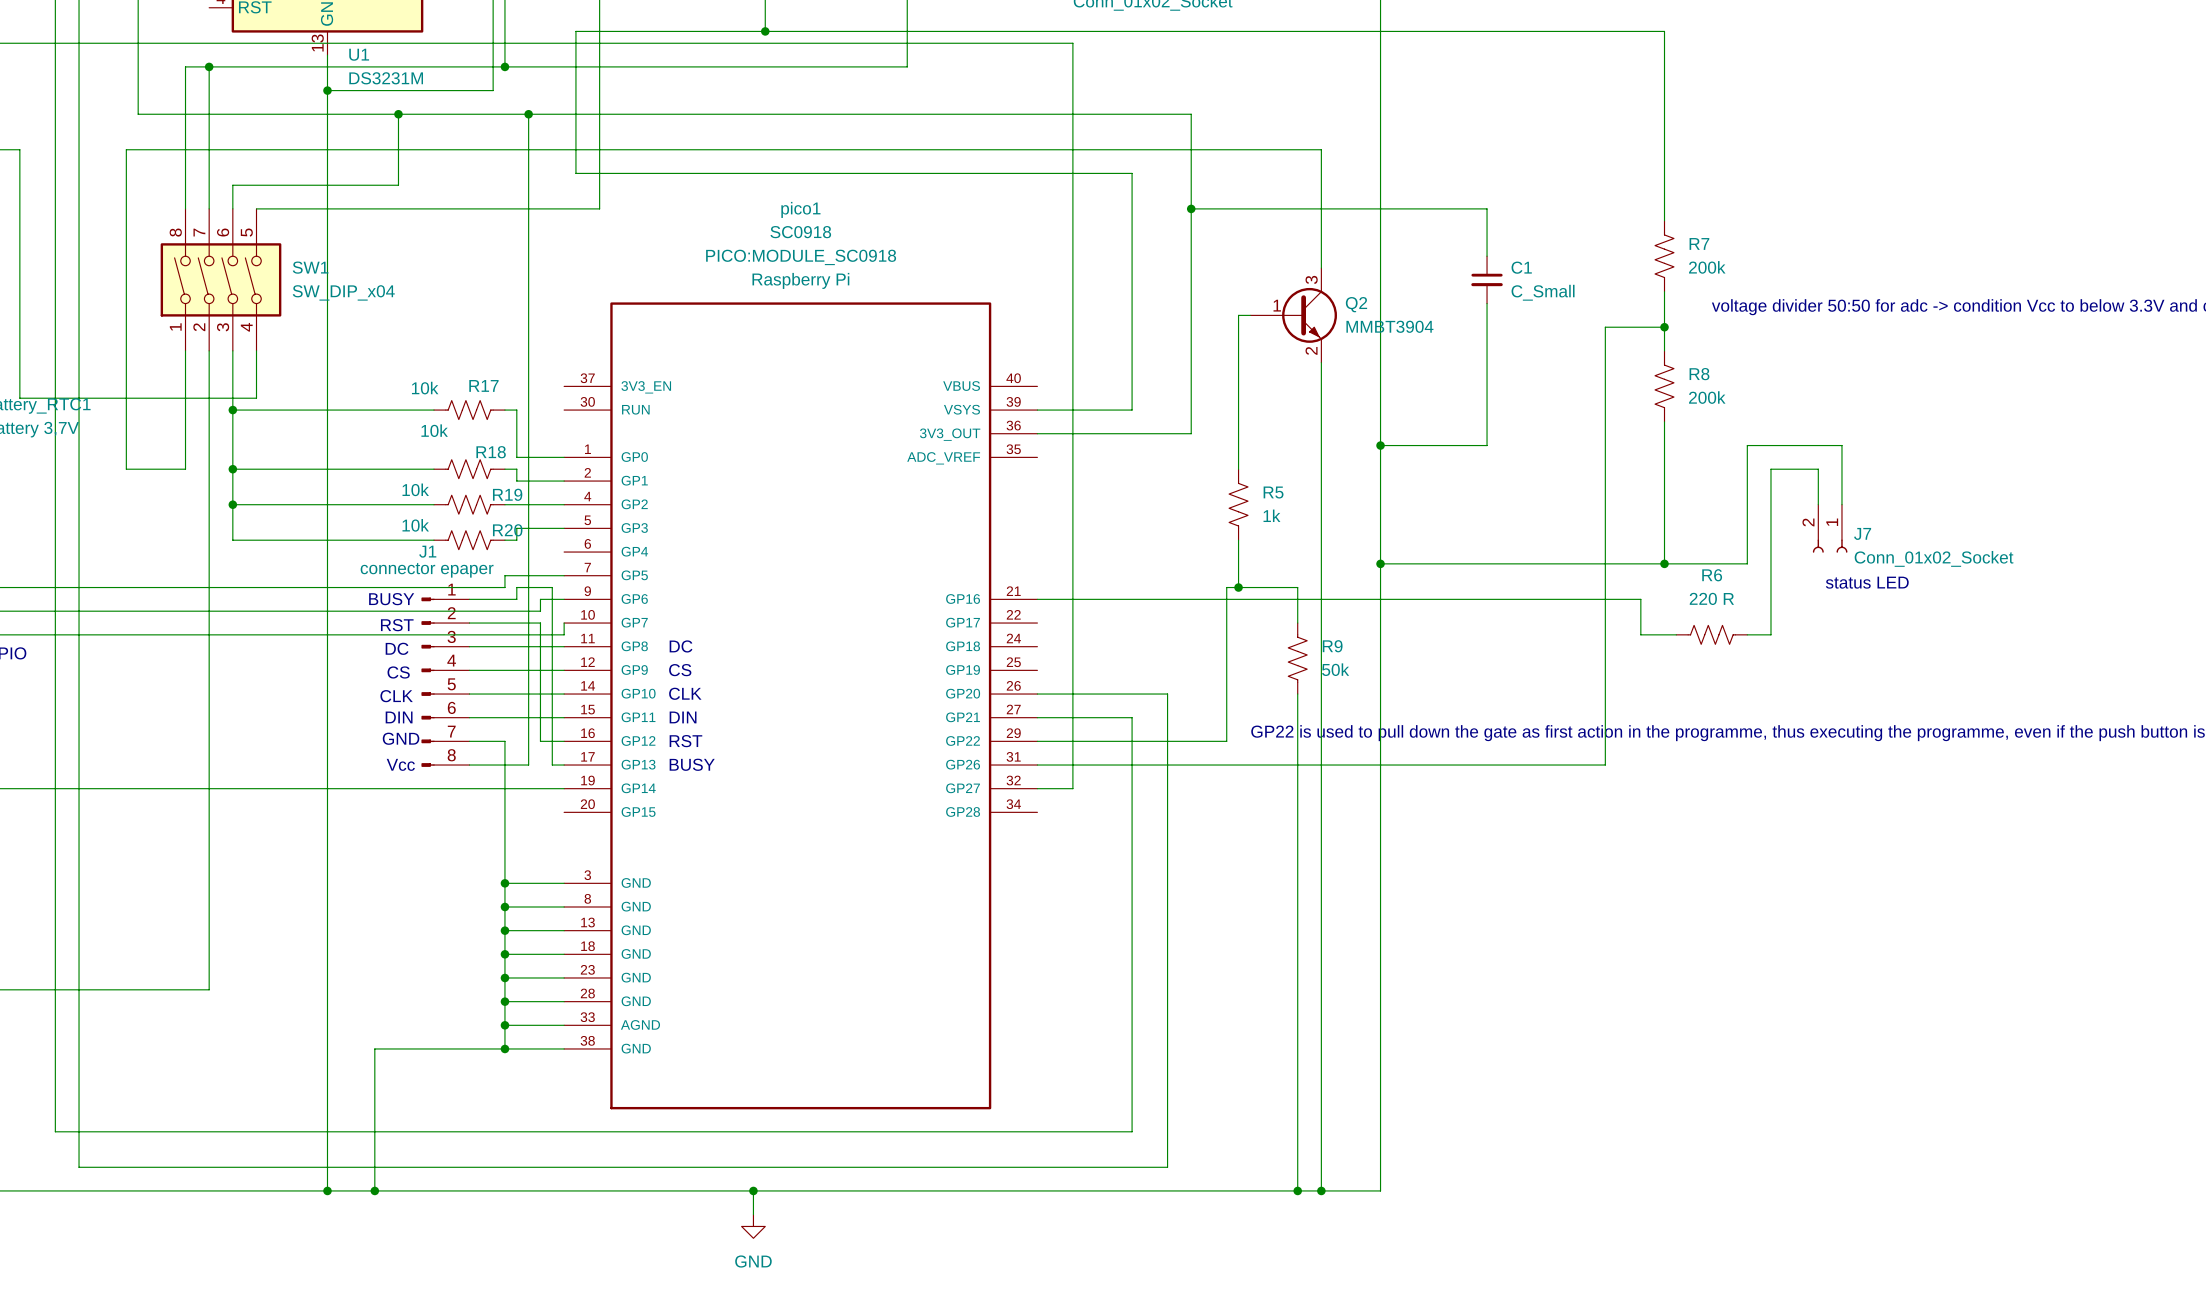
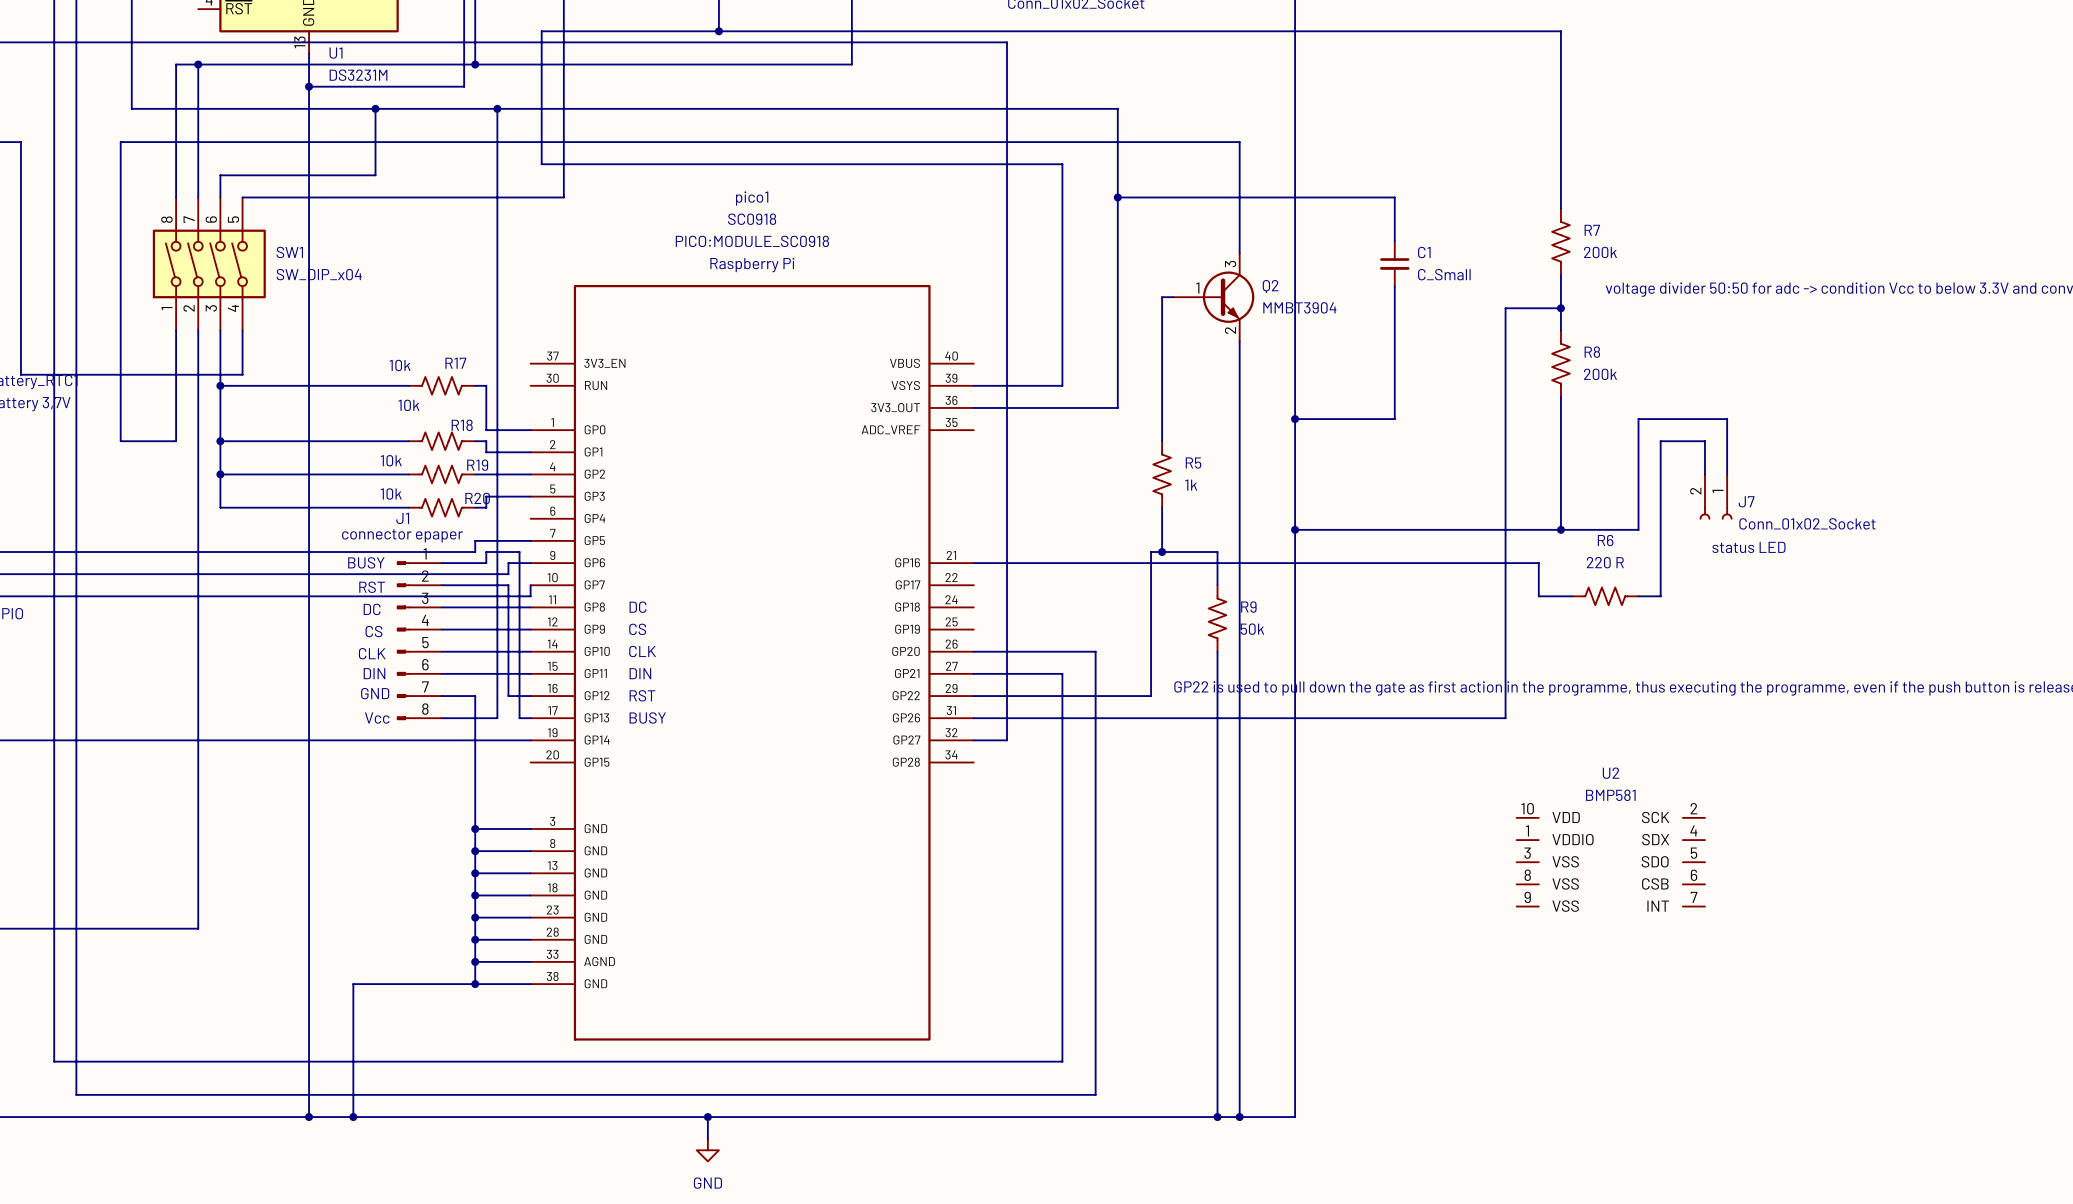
U2: none -> BMP581 (1610, 862)

